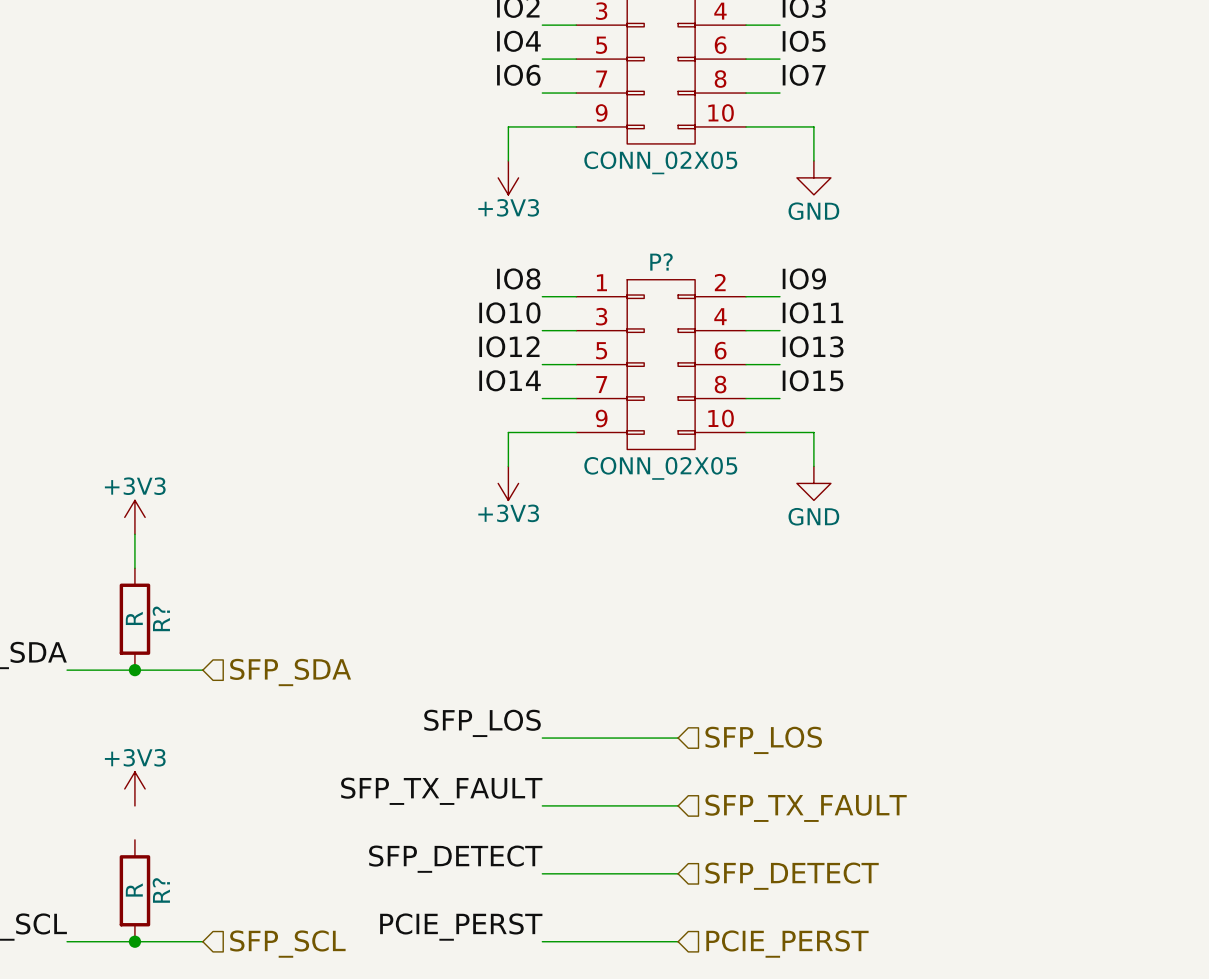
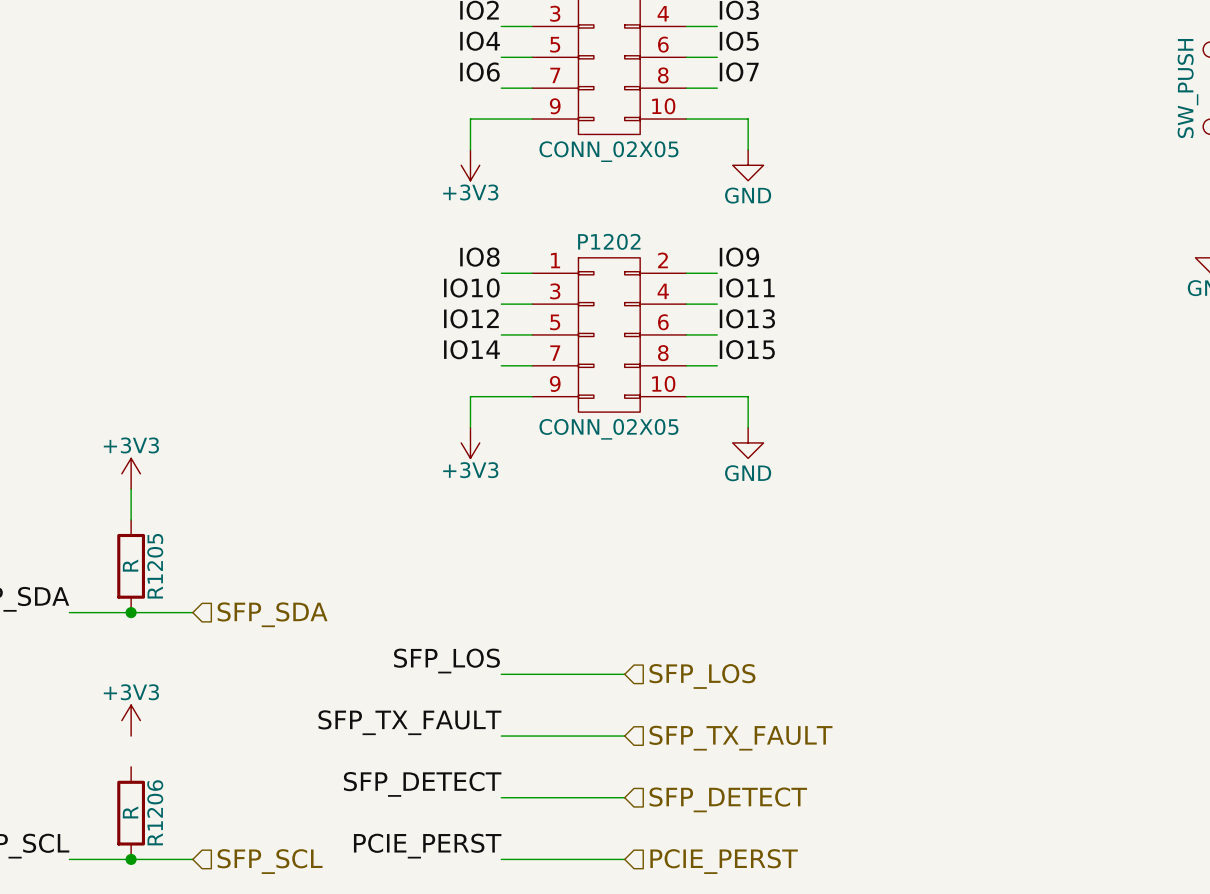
P? name: P? (661, 261) -> P1202 (609, 241)
R? name: R? (161, 618) -> R1205 (155, 566)
R? name: R? (161, 890) -> R1206 (155, 812)

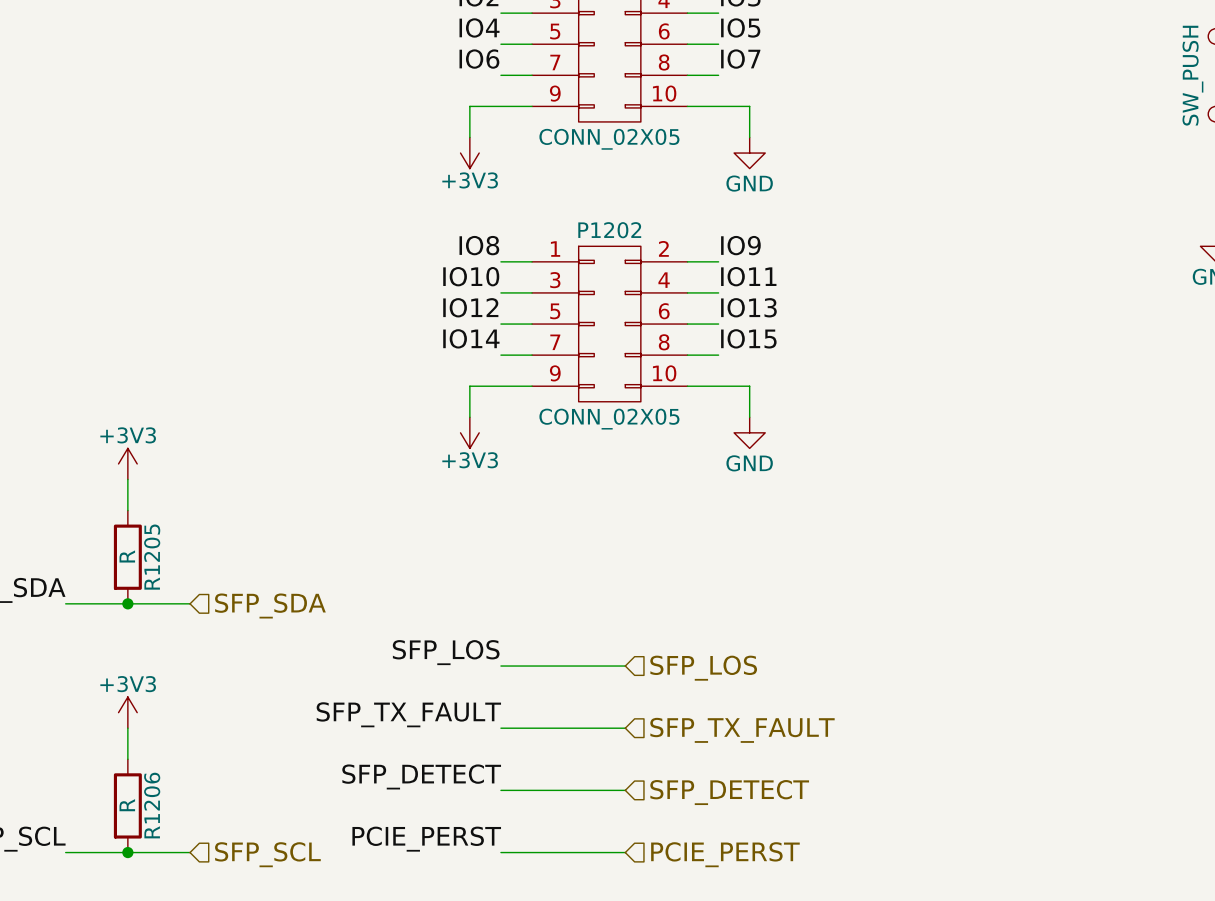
wire: none -> (127, 728) (127, 759)

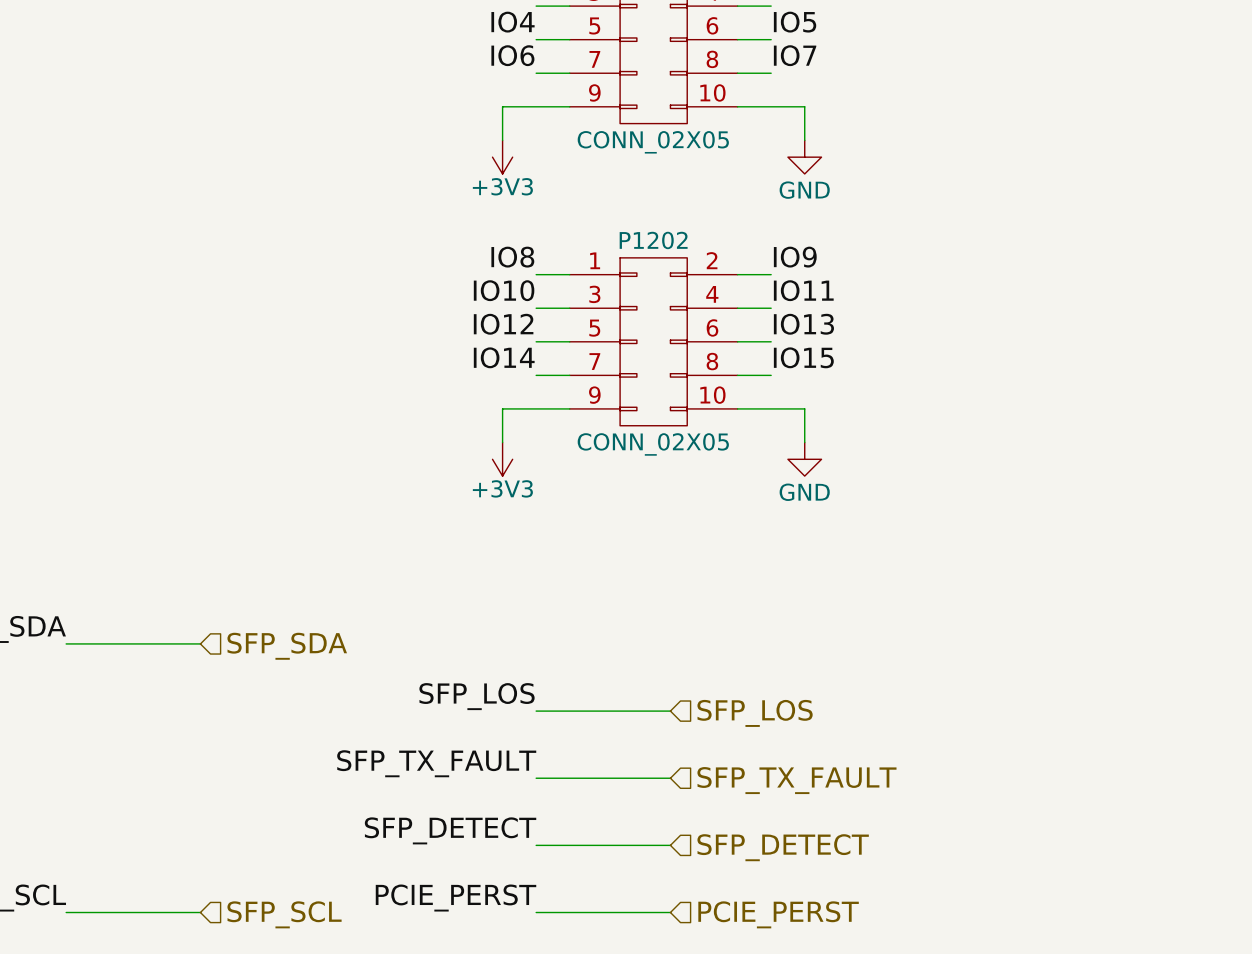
power symbol: +3V3 (127, 463) -> none
wire: (127, 479) (127, 510) -> none
R1205: R (127, 557) -> none
junction: (127, 603) -> none
power symbol: +3V3 (127, 712) -> none
wire: (127, 728) (127, 759) -> none
R1206: R (127, 805) -> none
junction: (127, 852) -> none

